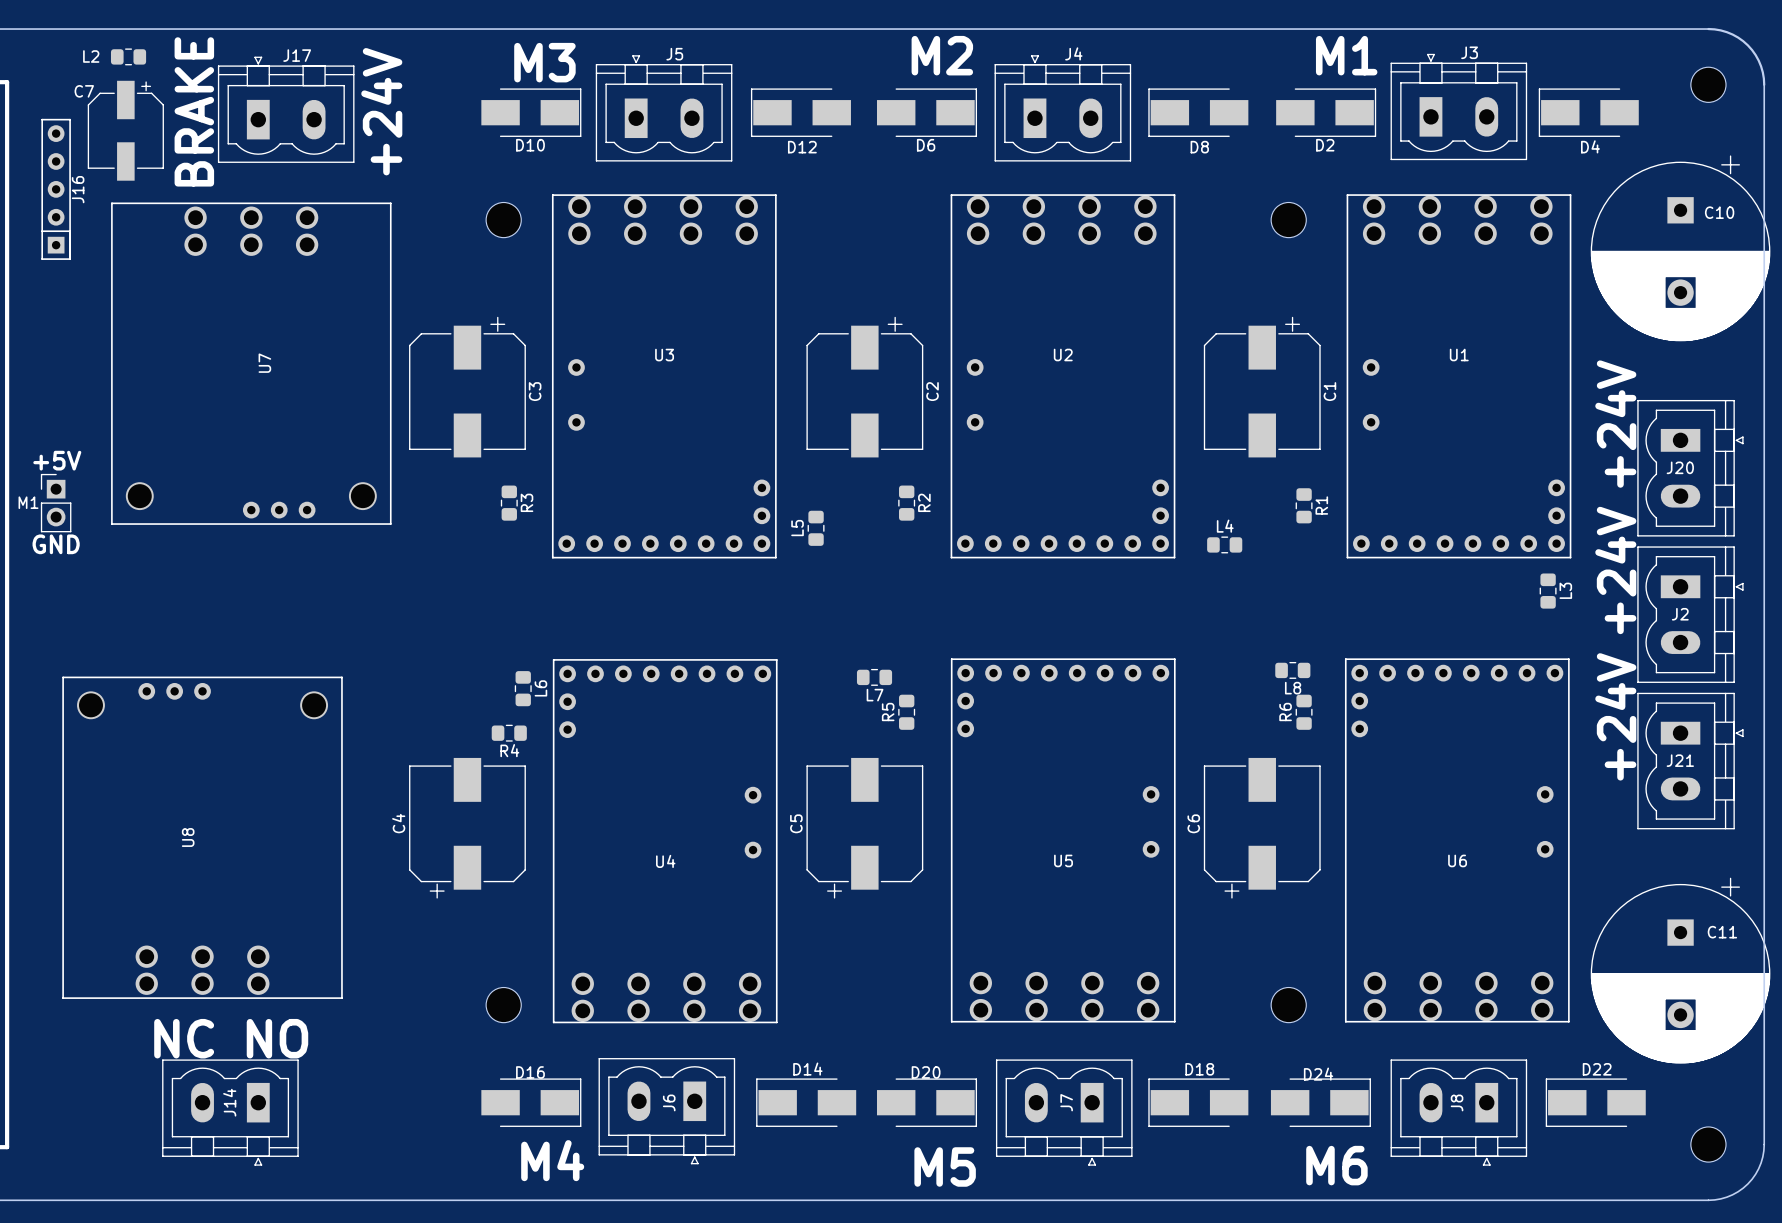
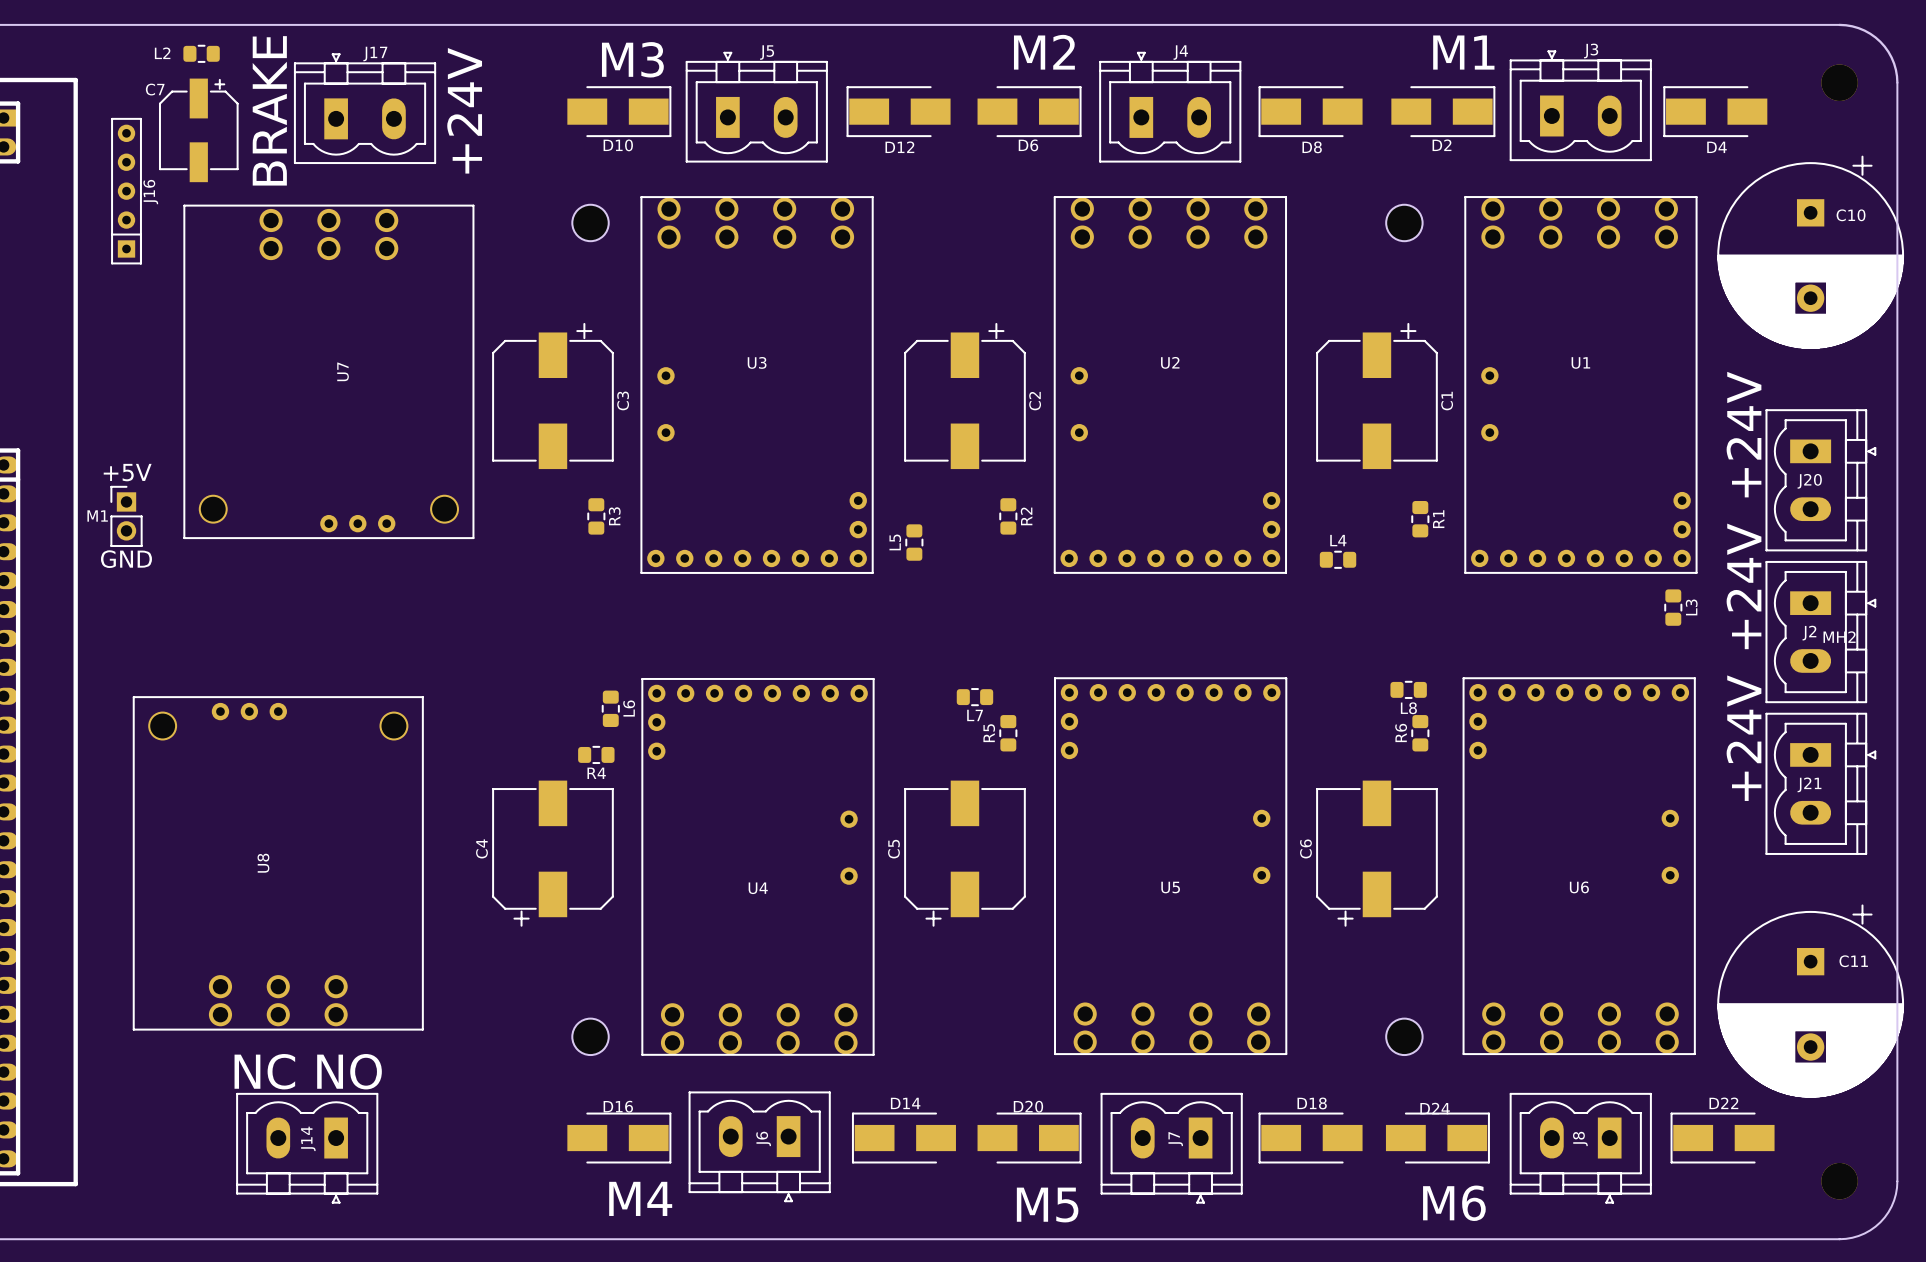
part: (1708, 84) -> none
MH2: none -> (1839, 631)
part: (1708, 1144) -> none

